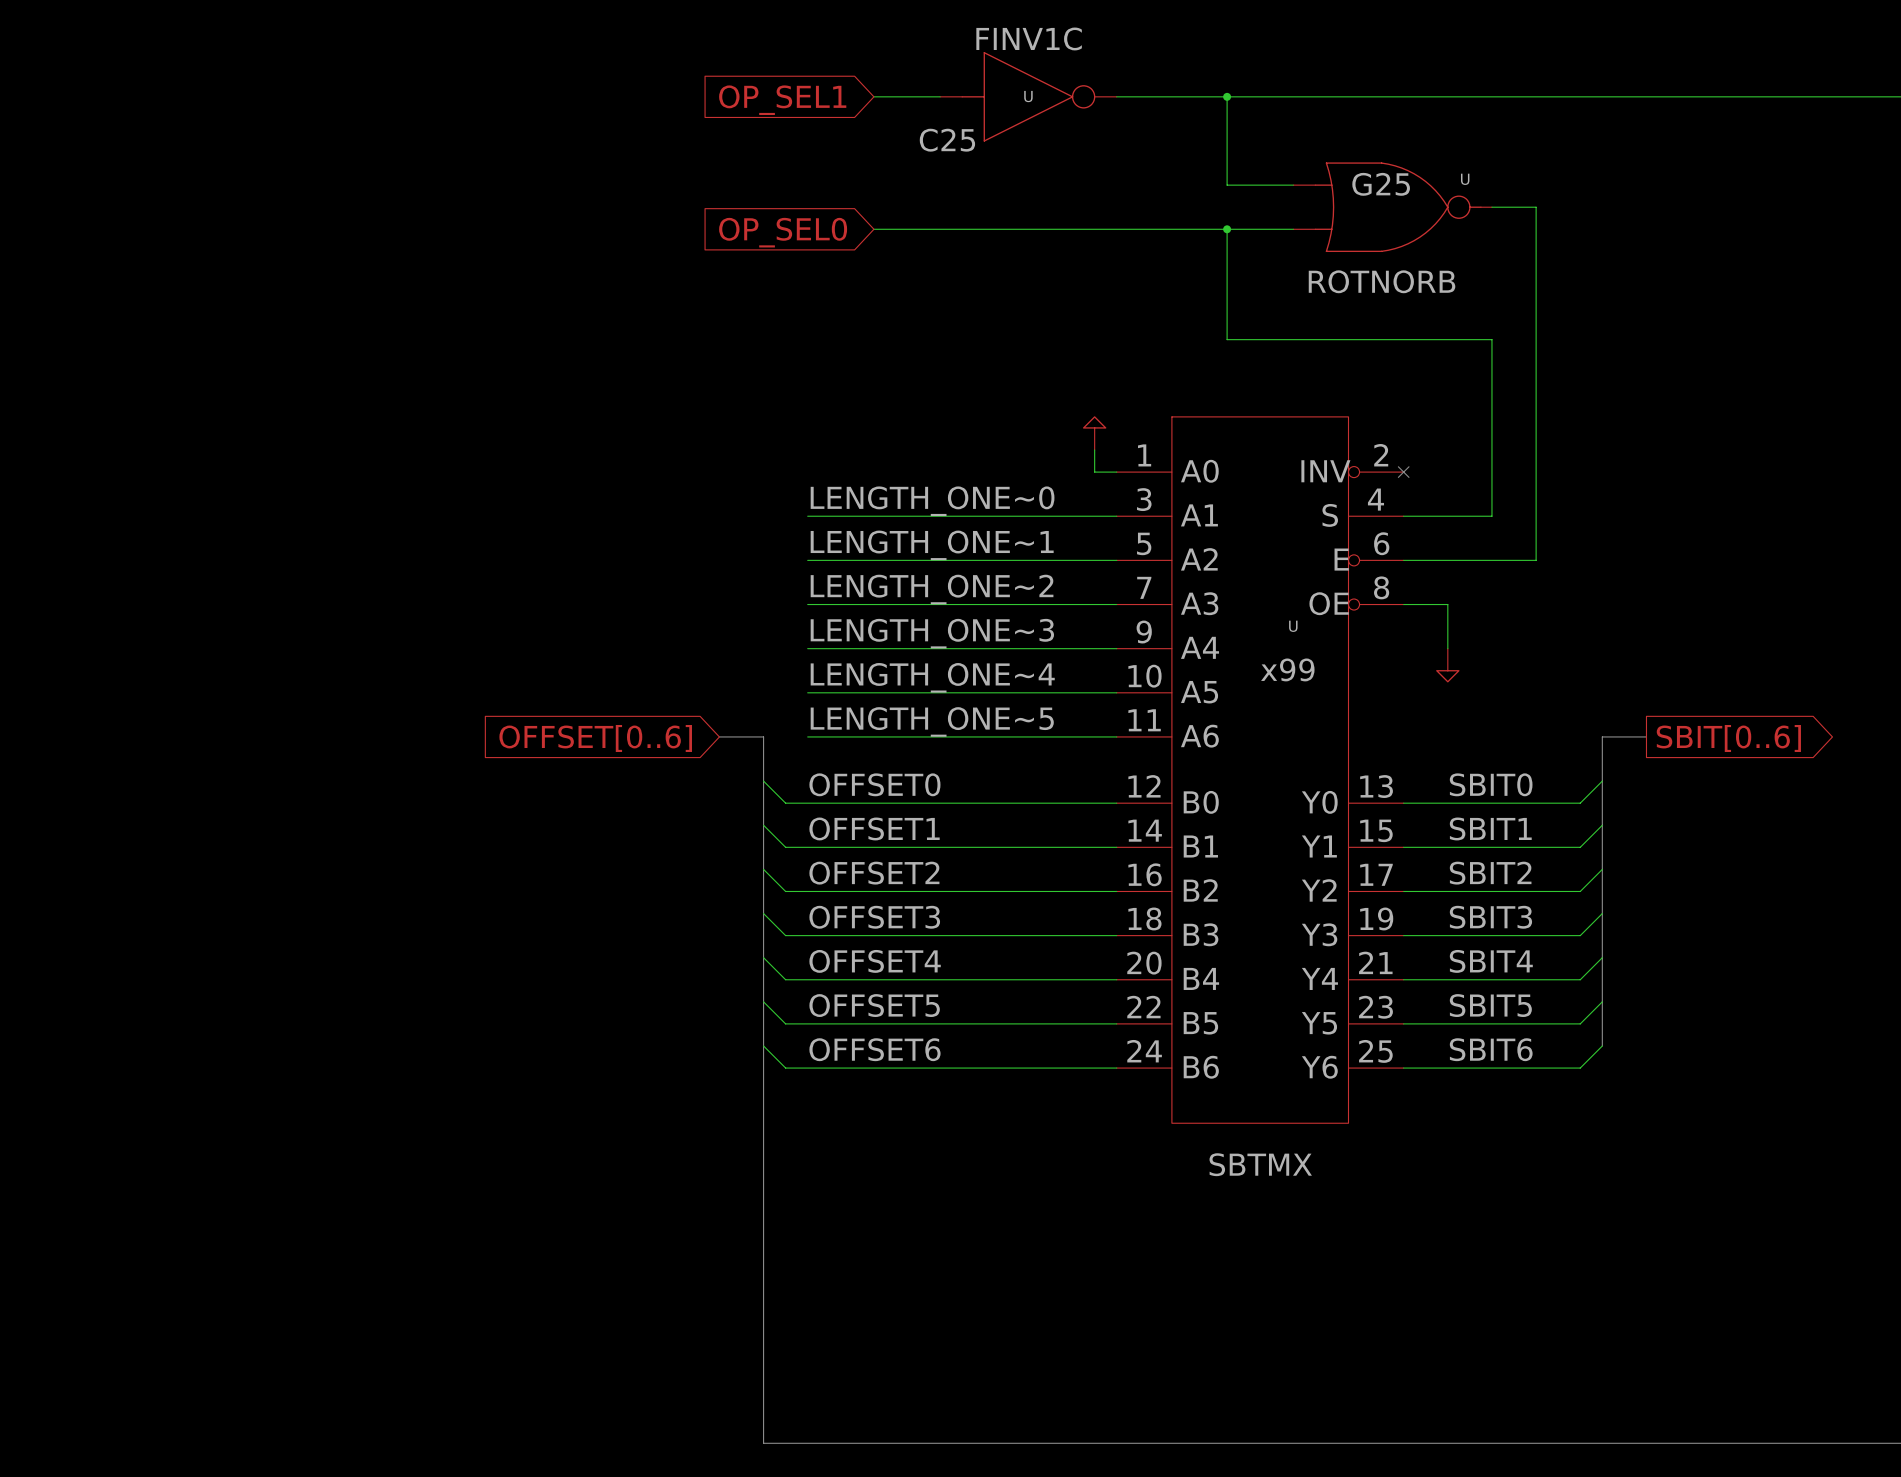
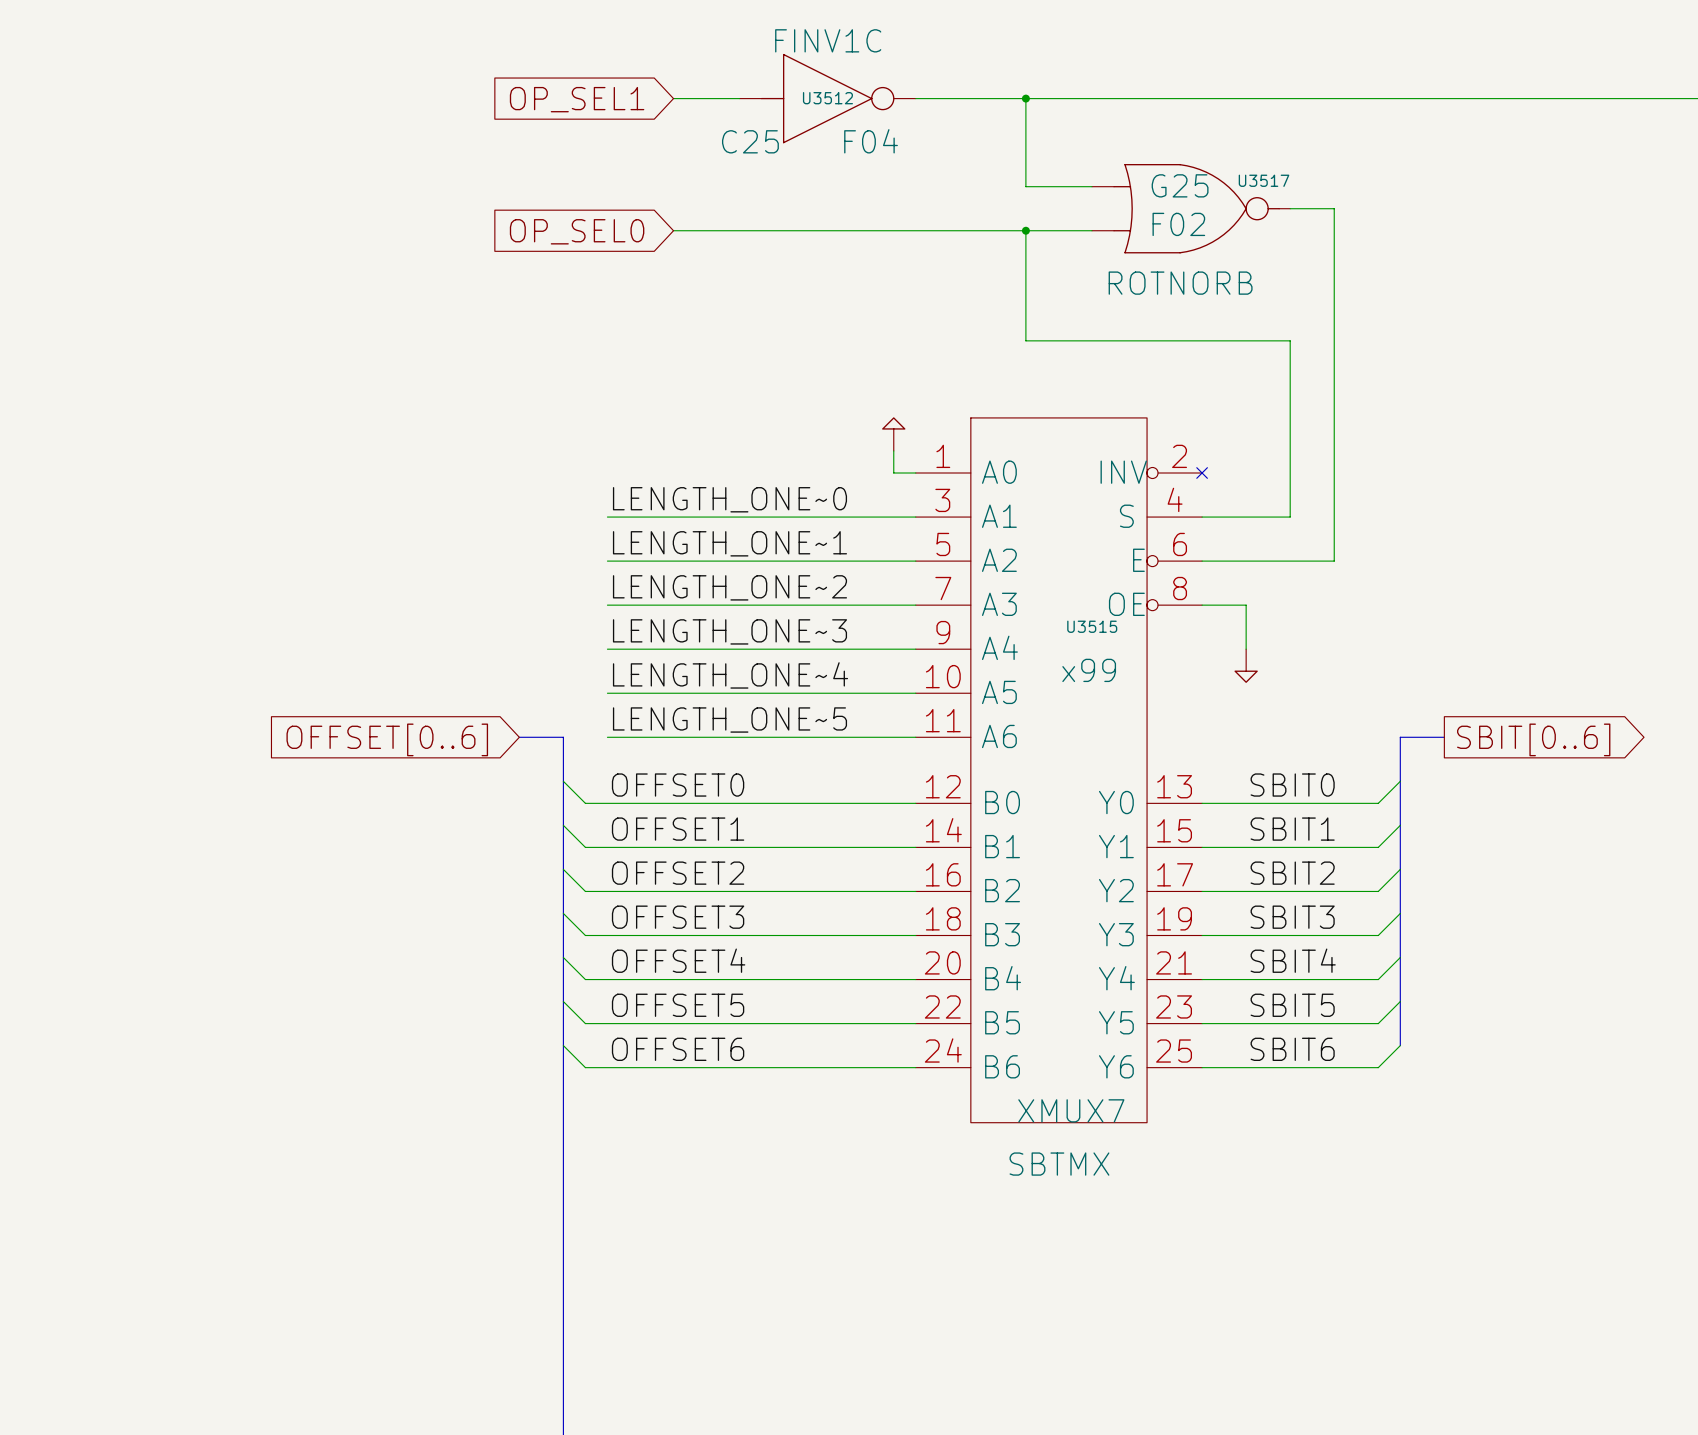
U name: U (1028, 96) -> U3512 (827, 98)
U value: none -> F04 (871, 141)
U name: U (1465, 179) -> U3517 (1264, 180)
U value: none -> F02 (1178, 224)
U name: U (1293, 626) -> U3515 (1092, 626)
U value: none -> XMUX7 (1071, 1110)

